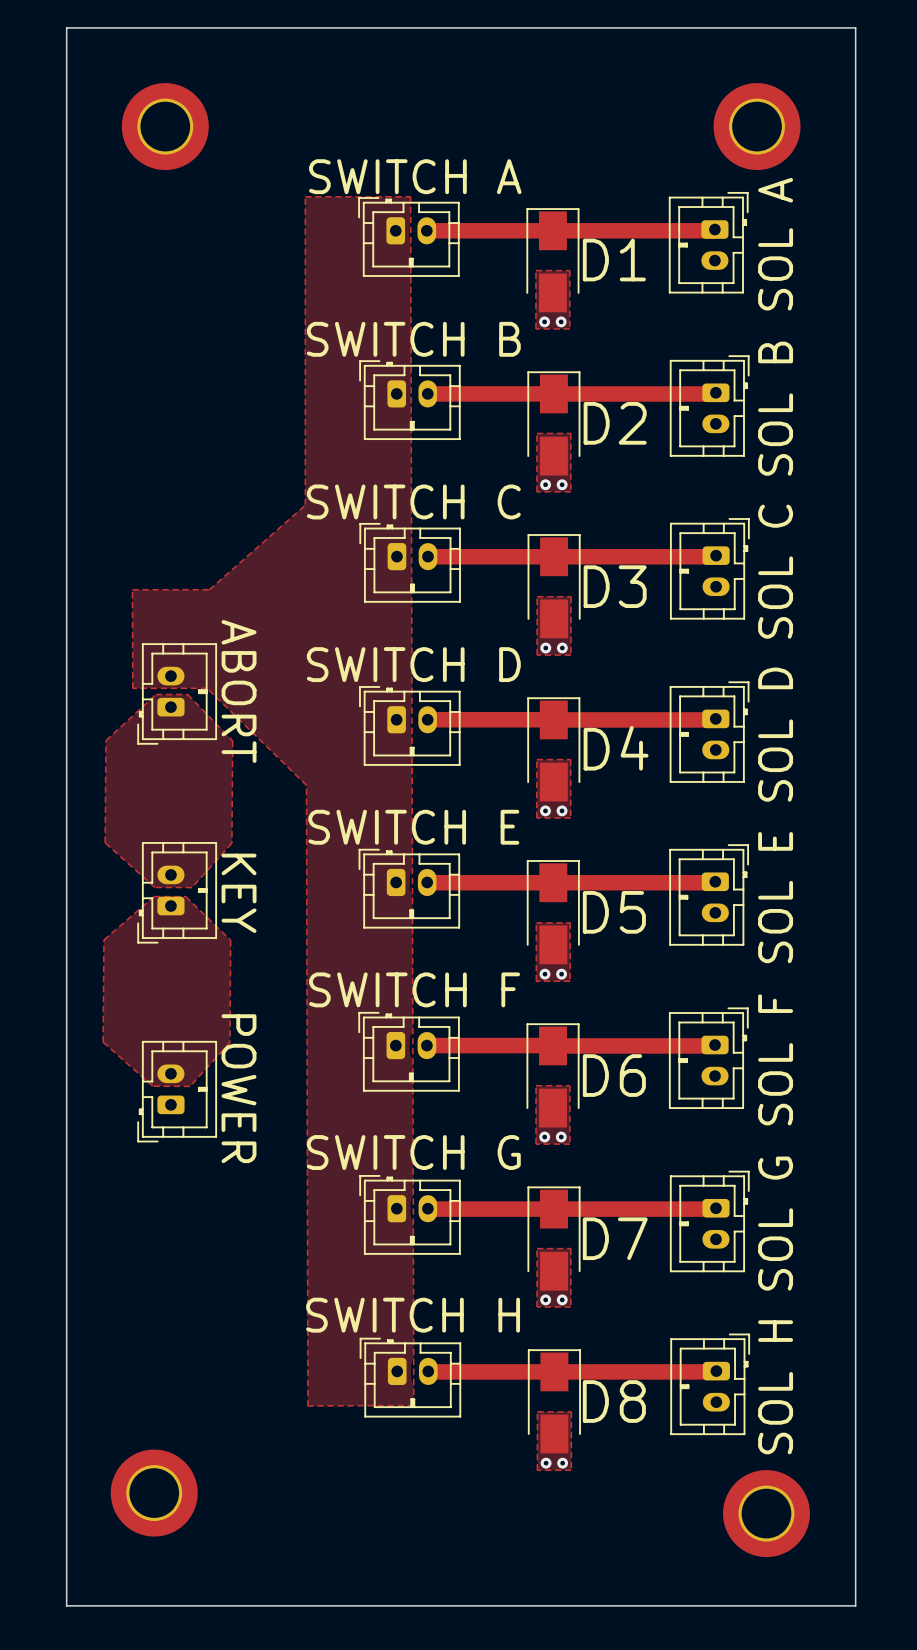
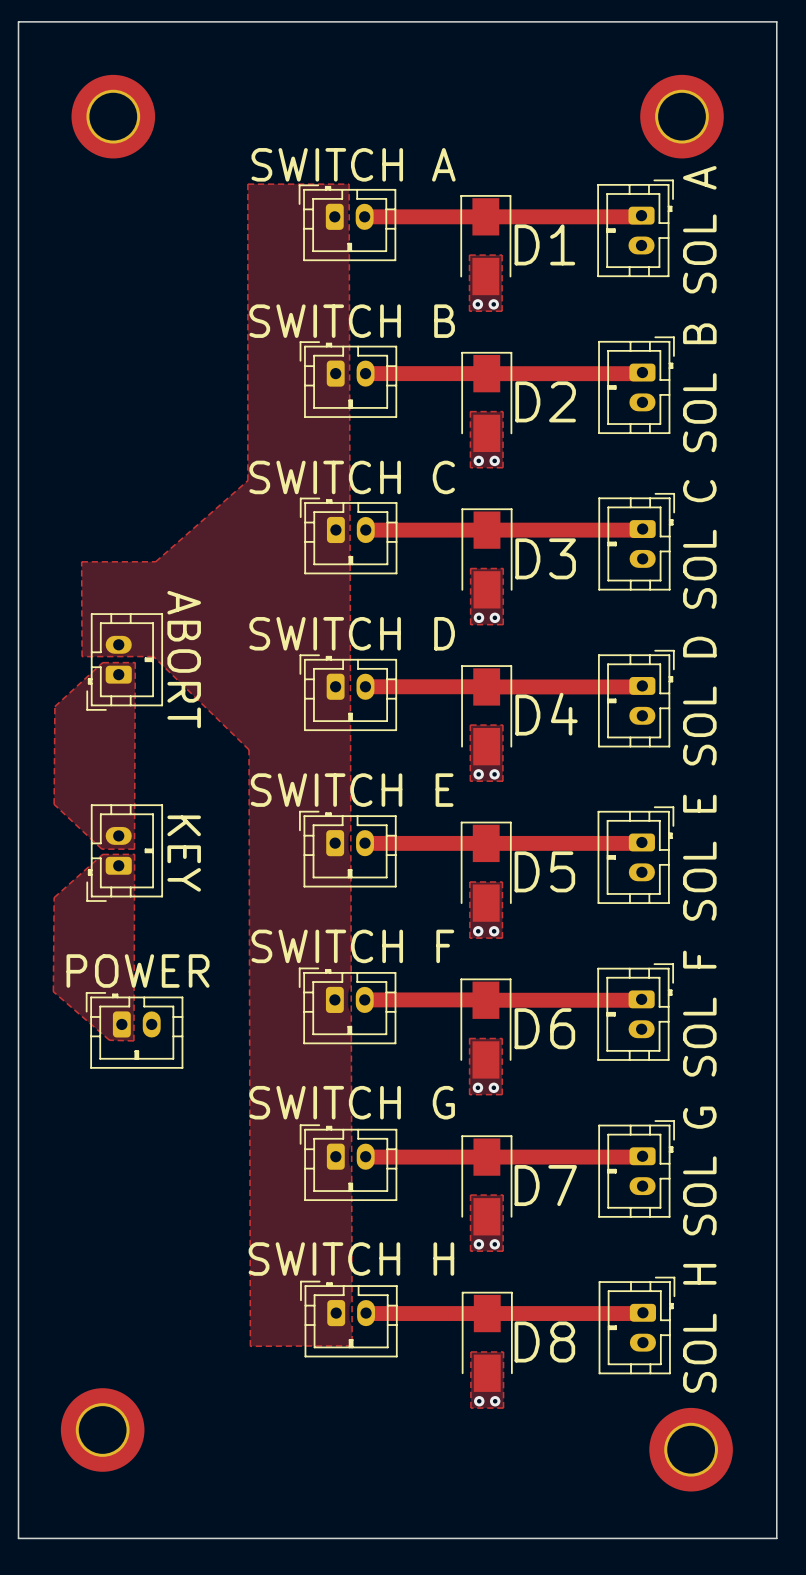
zone outline: (155, 694) (105, 740) (105, 842) (154, 887) (192, 887) (231, 843) (232, 740) (187, 694) (155, 694) -> (102, 662) (54, 706) (54, 804) (101, 849) (134, 849) (135, 662) (102, 662)
zone outline: (153, 896) (103, 939) (103, 1042) (152, 1086) (190, 1086) (229, 1042) (230, 940) (185, 896) (153, 896) -> (134, 854) (102, 854) (54, 897) (53, 991) (109, 1040) (133, 1040) (134, 854)
text rotation: 0° (238, 1088) -> 90° counterclockwise (138, 971)
part rotation: 0° (177, 1091) -> 90° clockwise (134, 1030)

